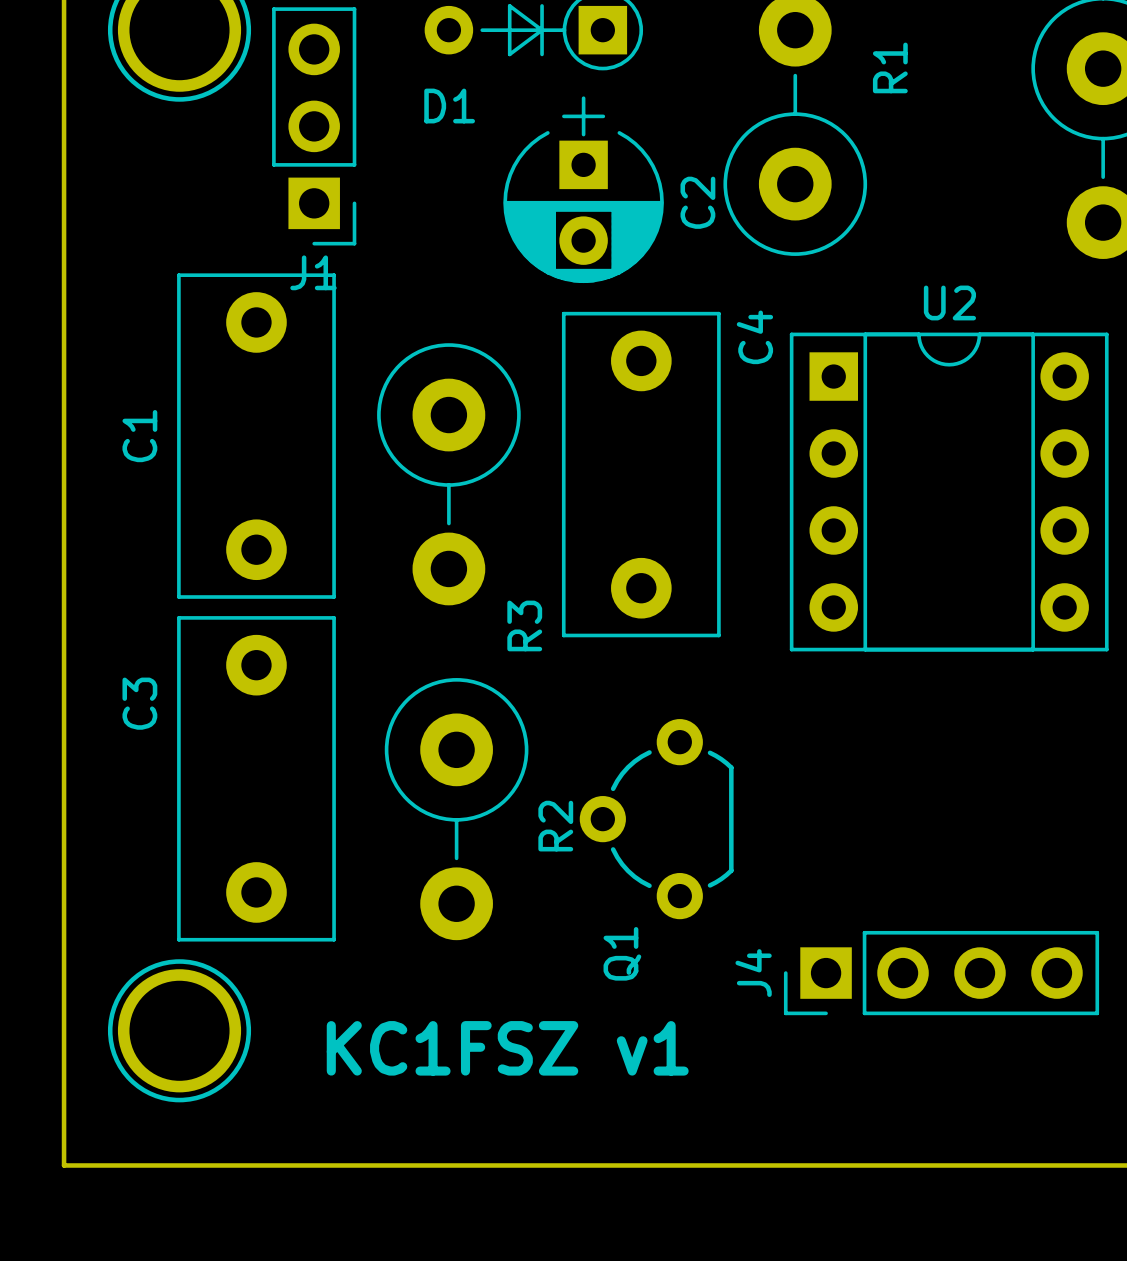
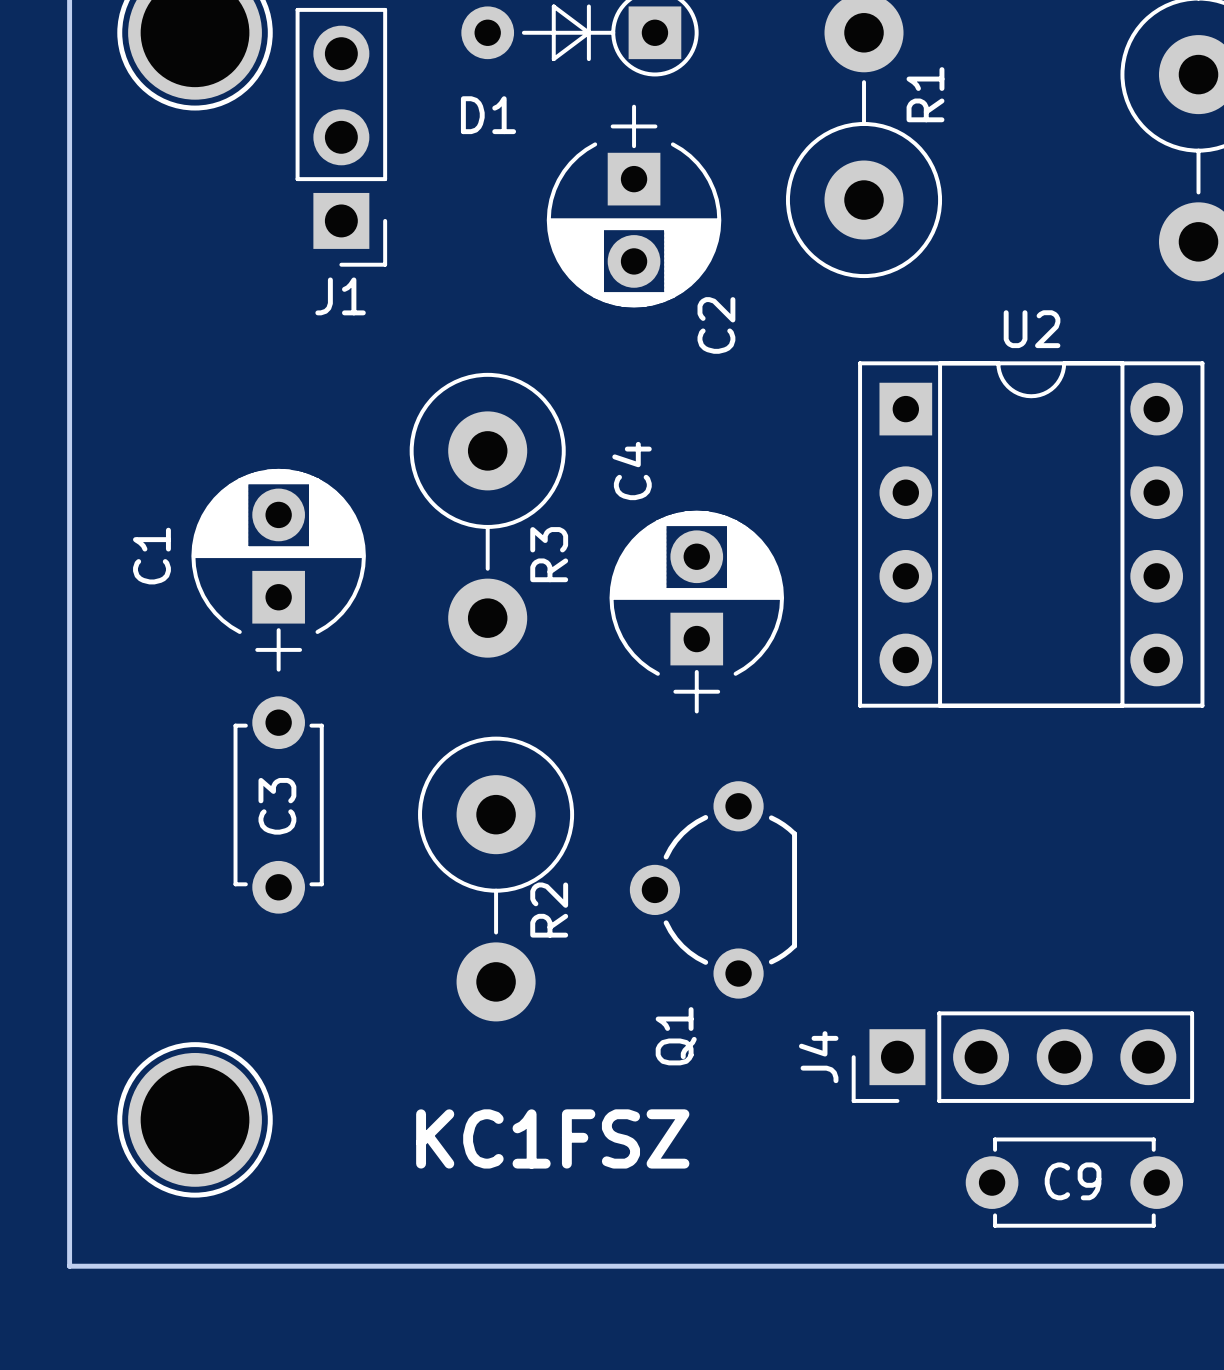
R1 name position: R1 (890, 67) -> R1 (925, 94)
C2 name position: C2 (697, 202) -> C2 (716, 325)
C1 footprint: [177, 273, 336, 599] -> [191, 468, 366, 672]
C4 footprint: [561, 311, 721, 638] -> [609, 510, 785, 714]
C4 name position: C4 (754, 337) -> C4 (632, 471)
C3 footprint: [177, 616, 336, 942] -> [233, 696, 324, 914]
R3 name position: R3 (524, 625) -> R3 (549, 554)
C3 name position: C3 (139, 703) -> C3 (277, 806)
R2 name position: R2 (555, 826) -> R2 (549, 910)
text: KC1FSZ v1 (507, 1048) -> KC1FSZ (552, 1138)
C9: none -> (1074, 1182)

